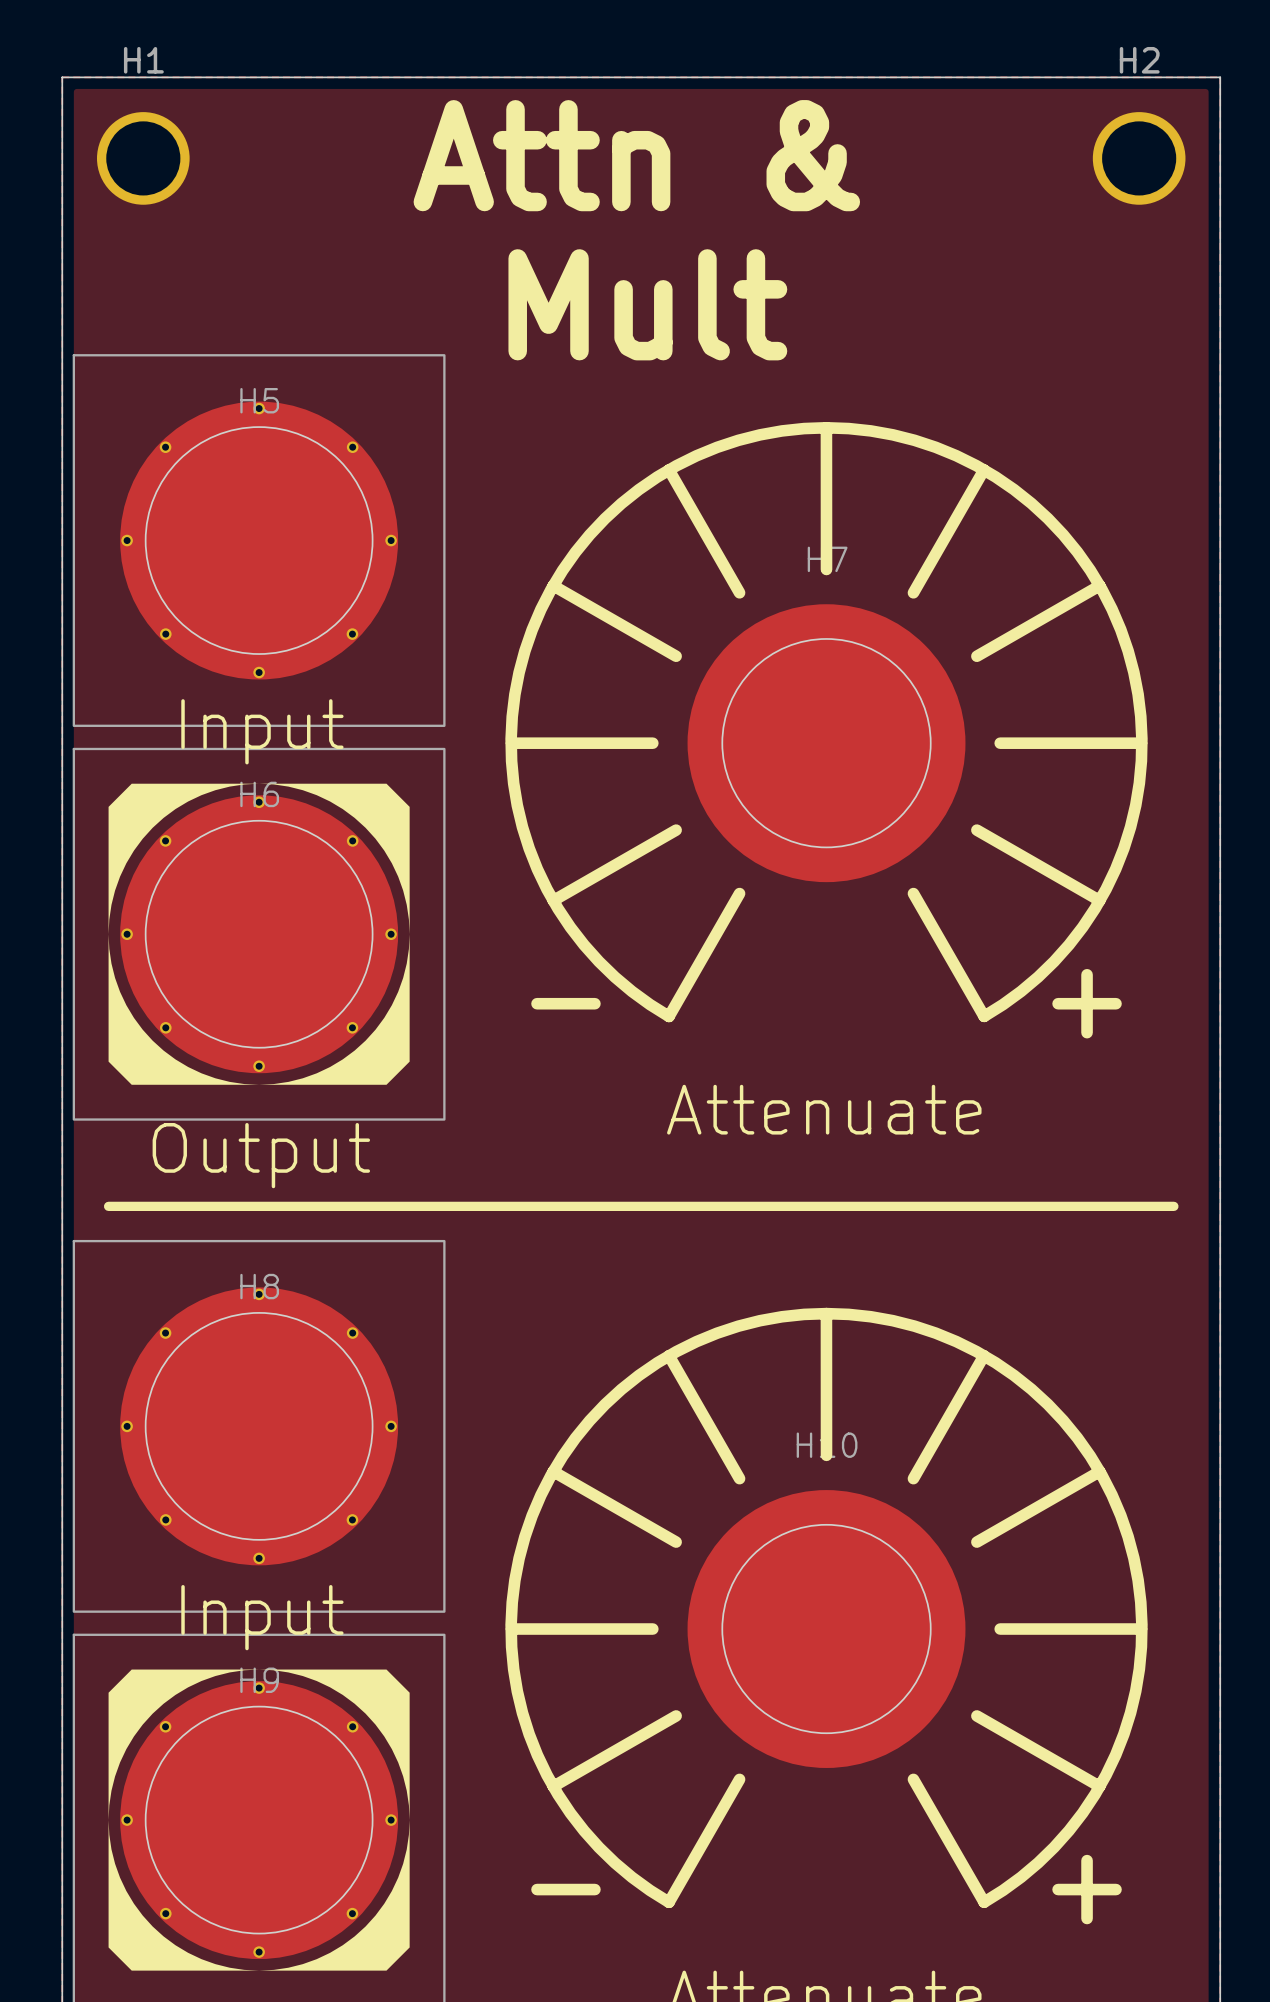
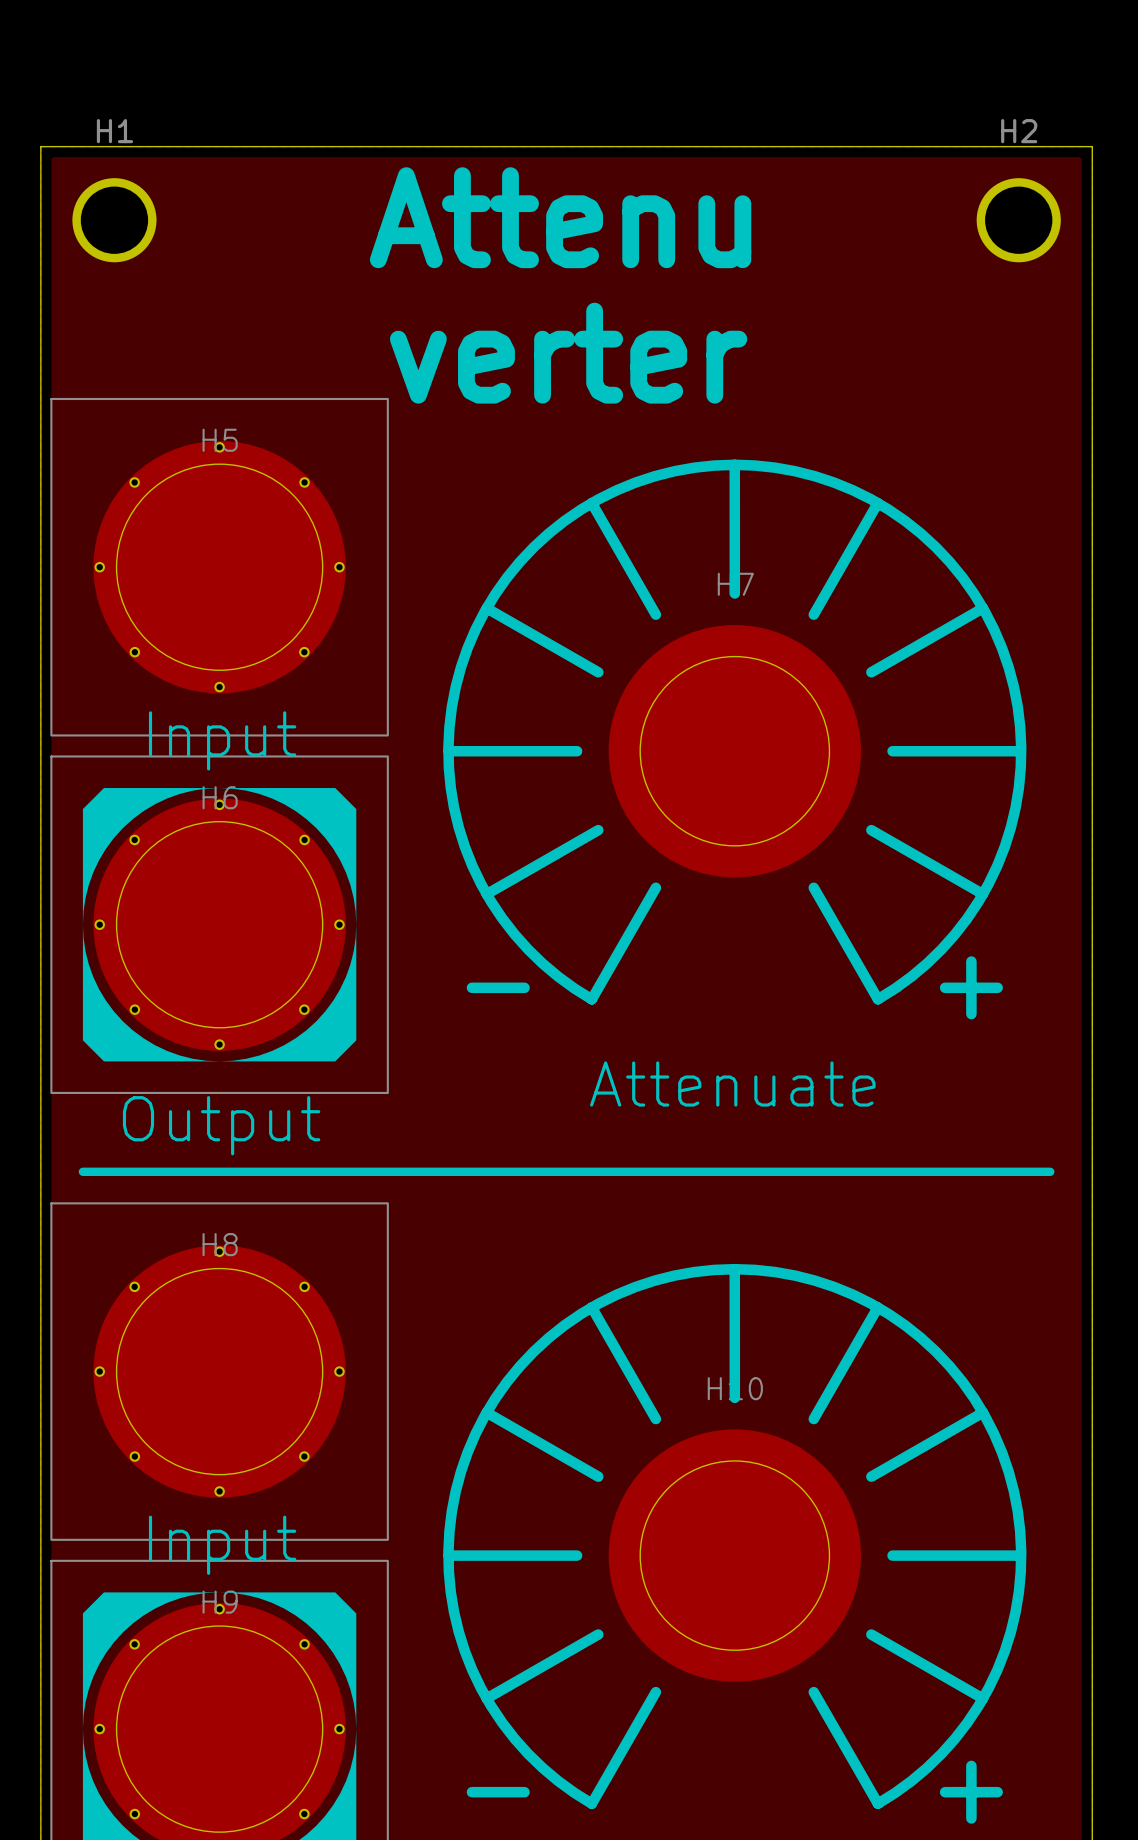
text: Attn & (636, 155) -> Attenu (560, 217)
text: Mult (647, 304) -> verter (568, 353)

